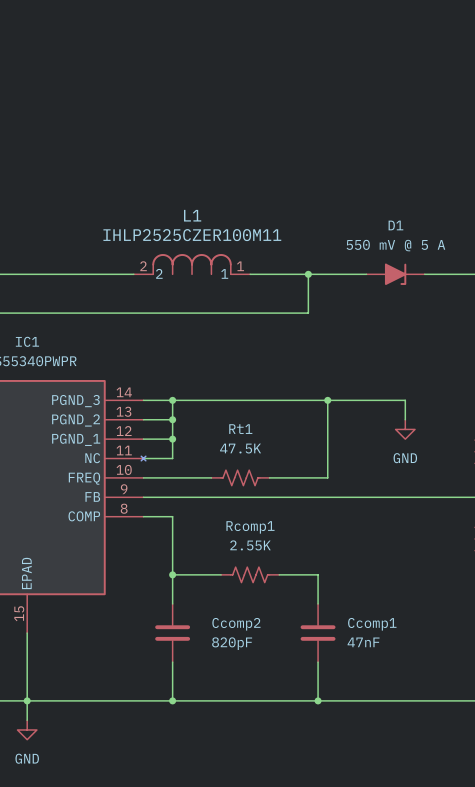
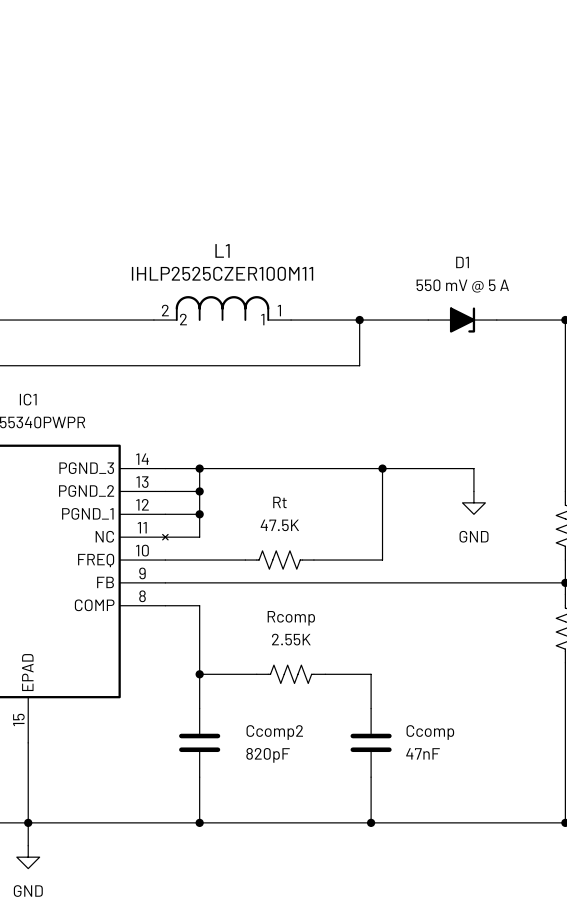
Rt1 name: Rt1 (240, 429) -> Rt (279, 502)
Rcomp1 name: Rcomp1 (250, 527) -> Rcomp (291, 618)
Ccomp1 name: Ccomp1 (372, 624) -> Ccomp (430, 732)

